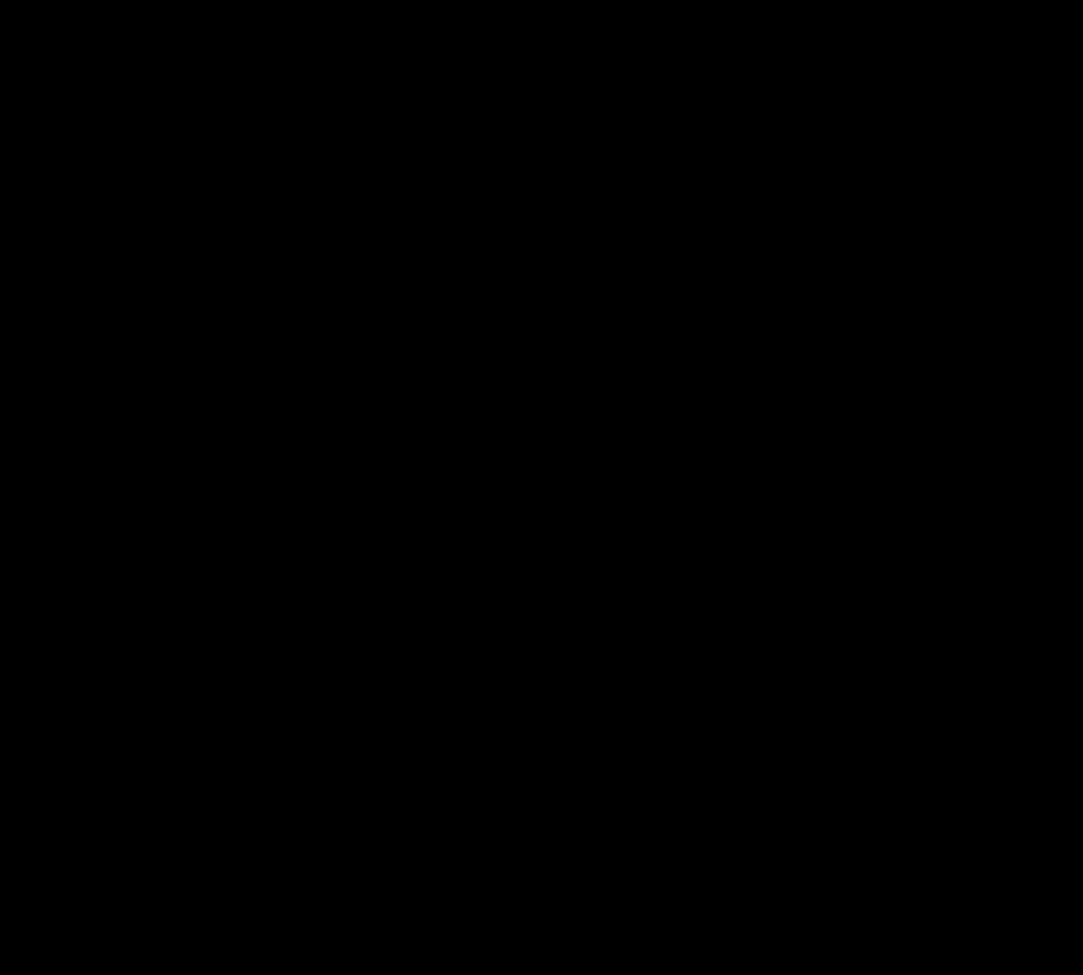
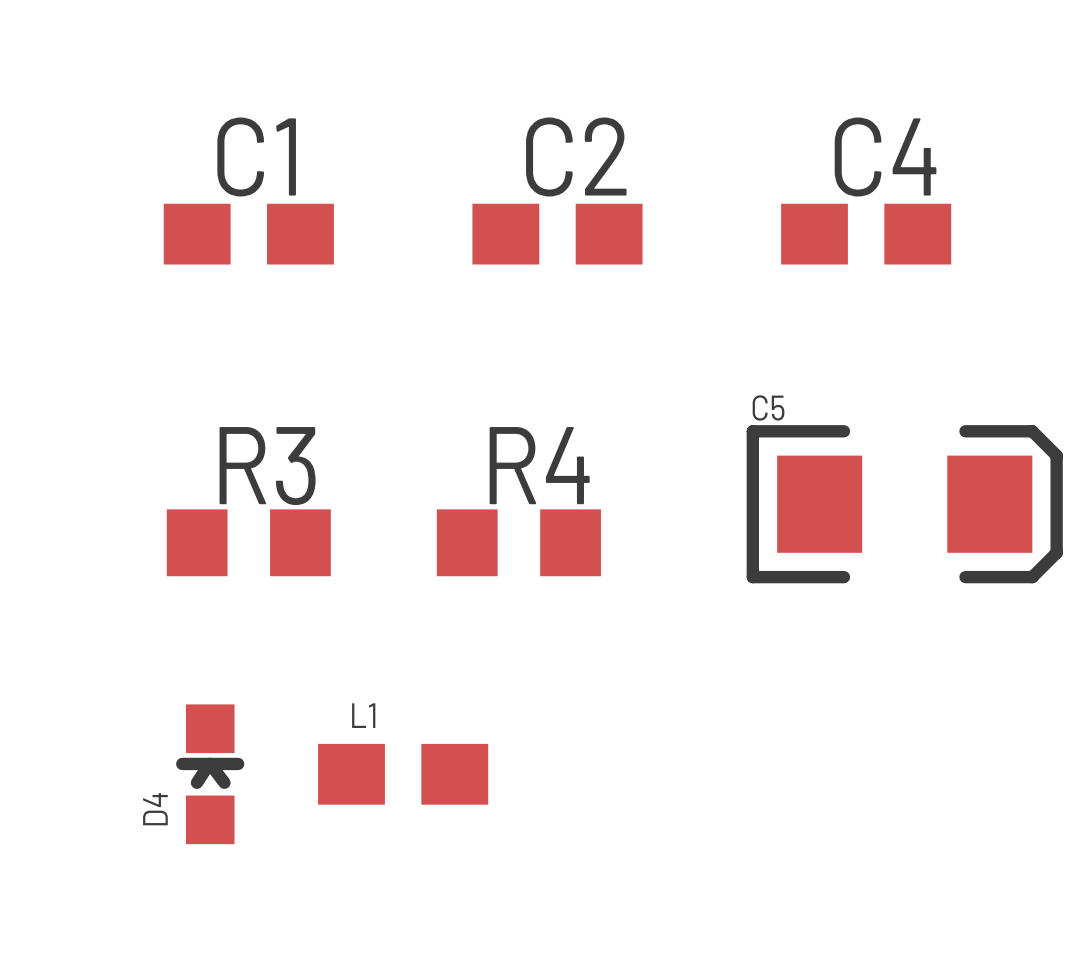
C1: none -> (248, 234)
C2: none -> (557, 234)
C4: none -> (866, 234)
C5: none -> (904, 504)
R3: none -> (248, 542)
R4: none -> (518, 542)
D4: none -> (210, 774)
L1: none -> (403, 774)

